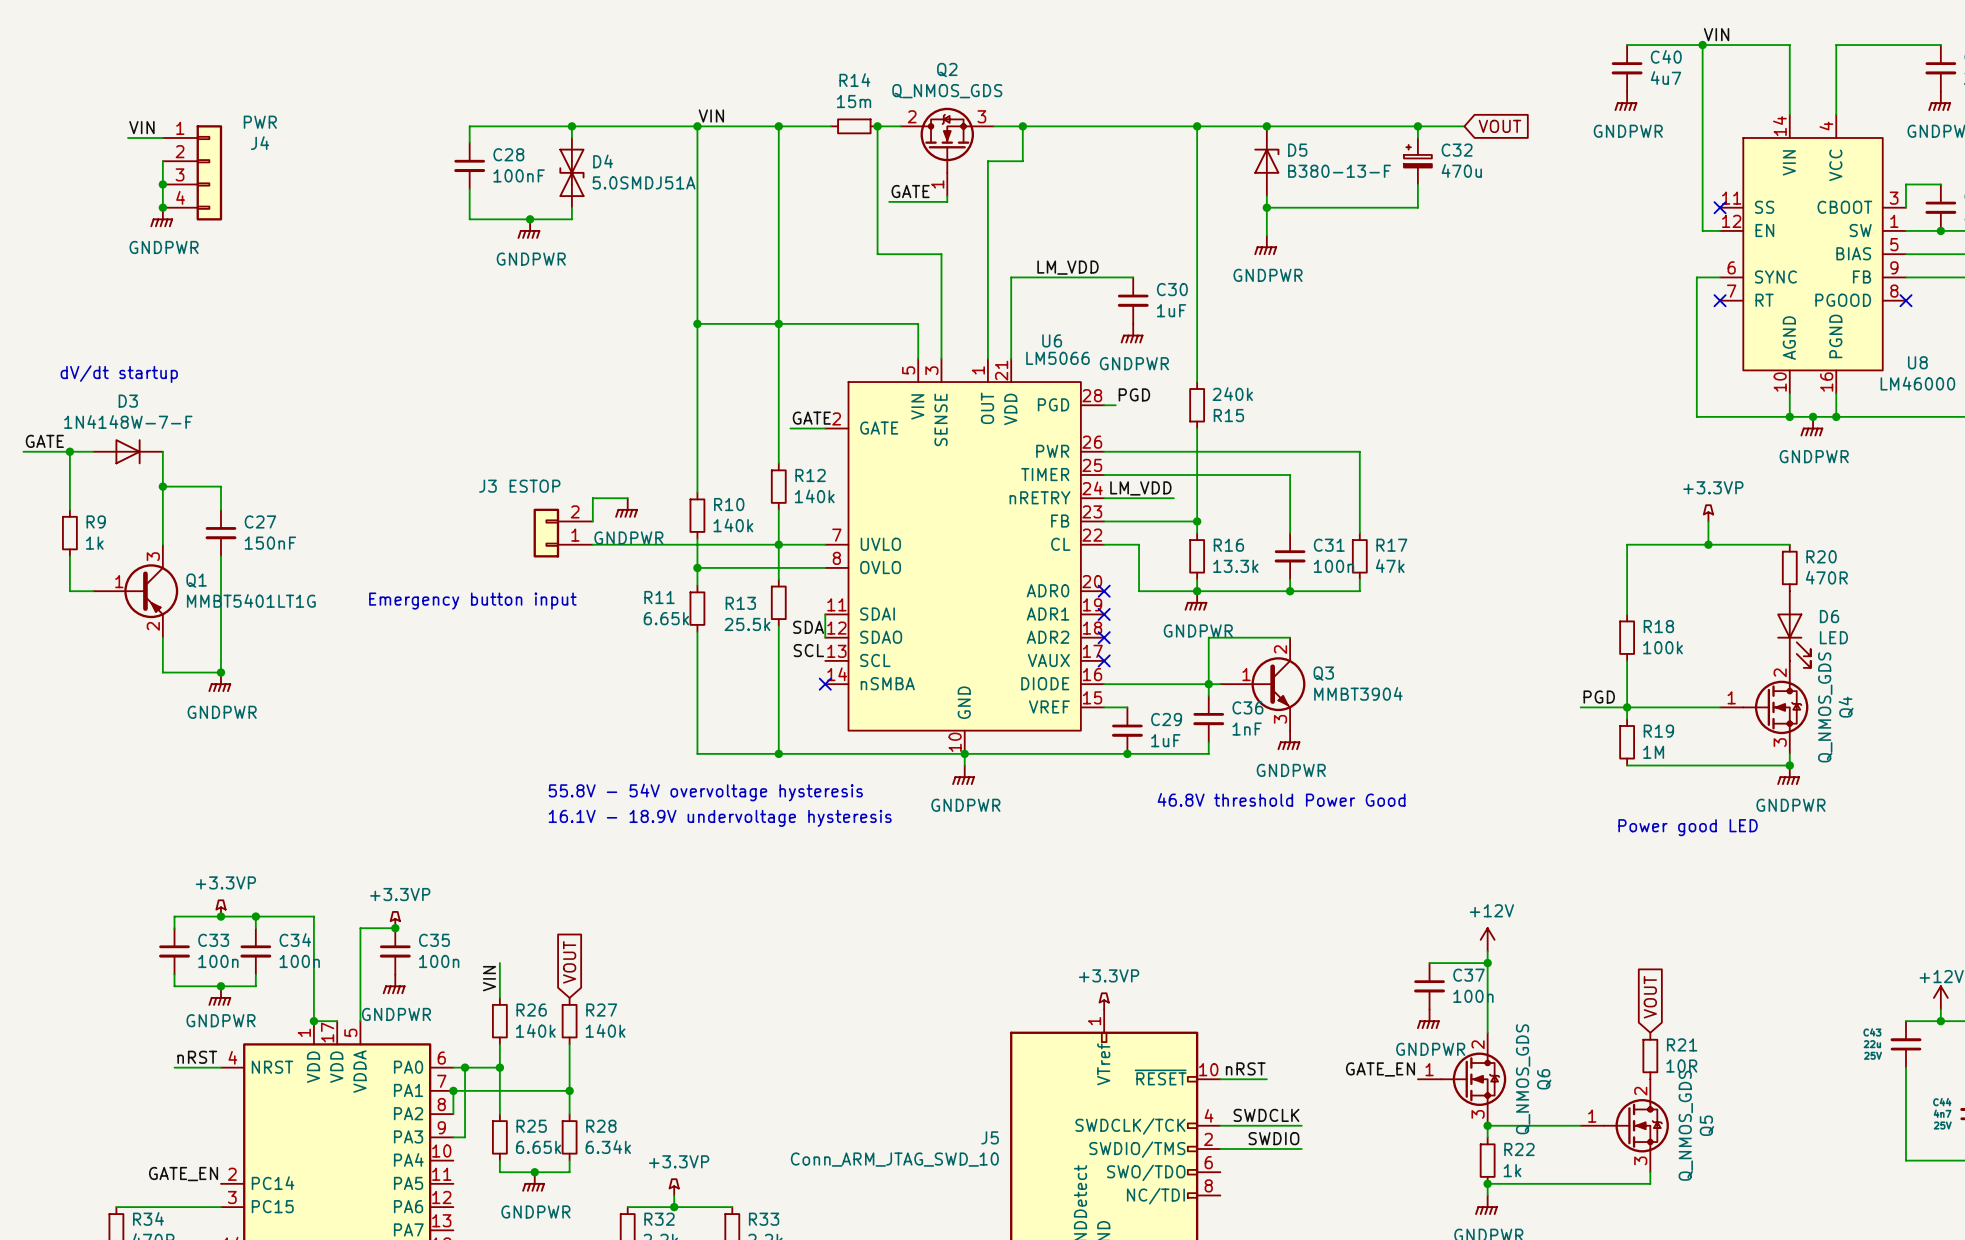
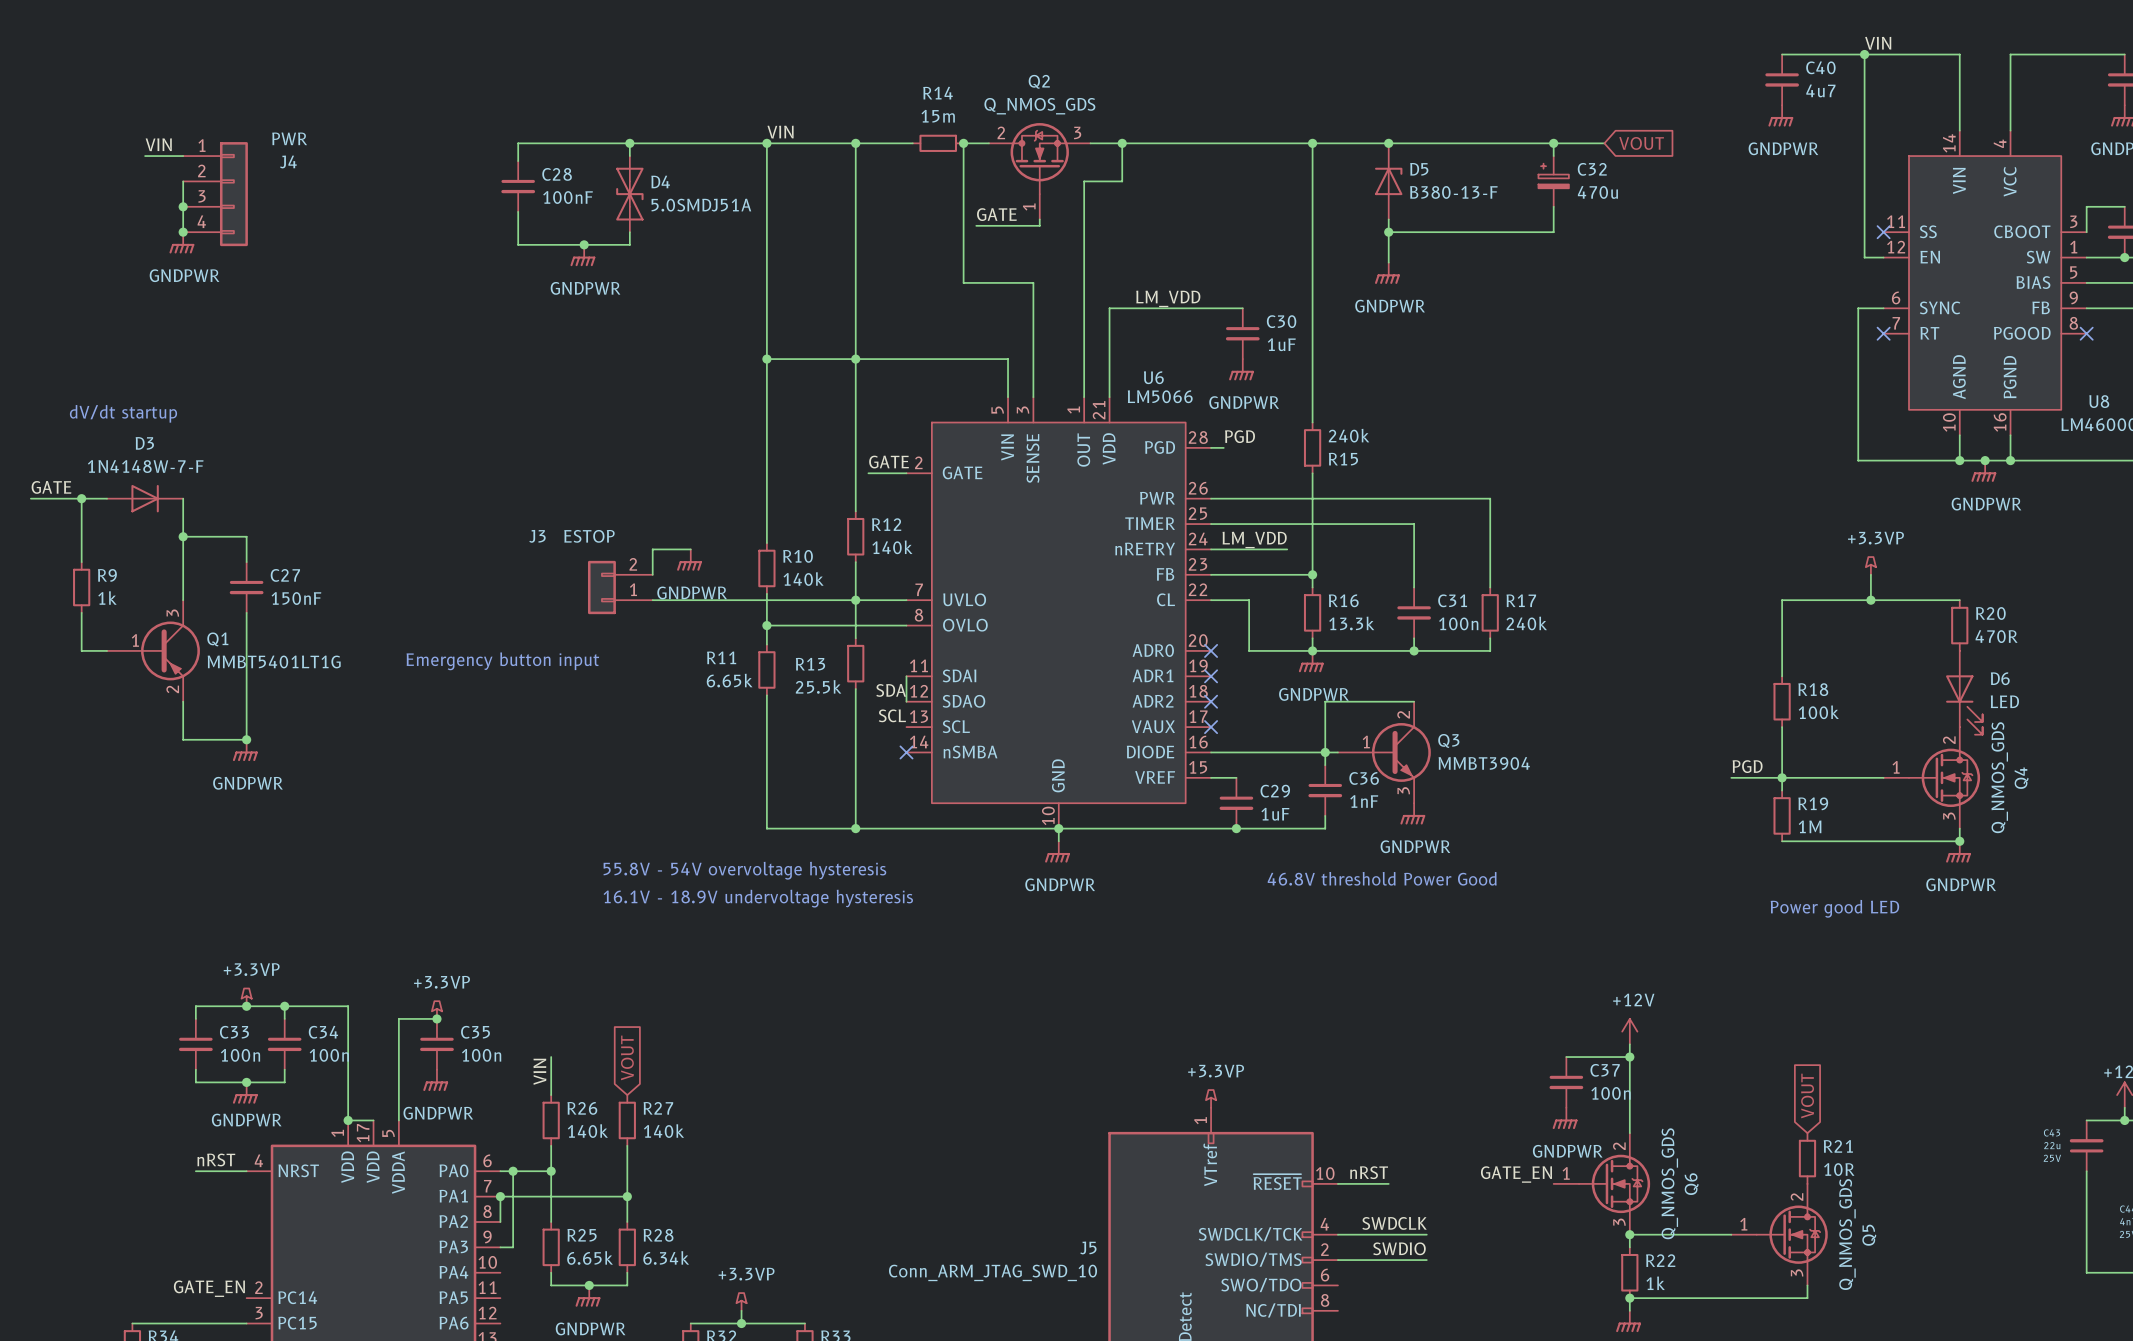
R17 value: 47k (1390, 566) -> 240k (1526, 623)

